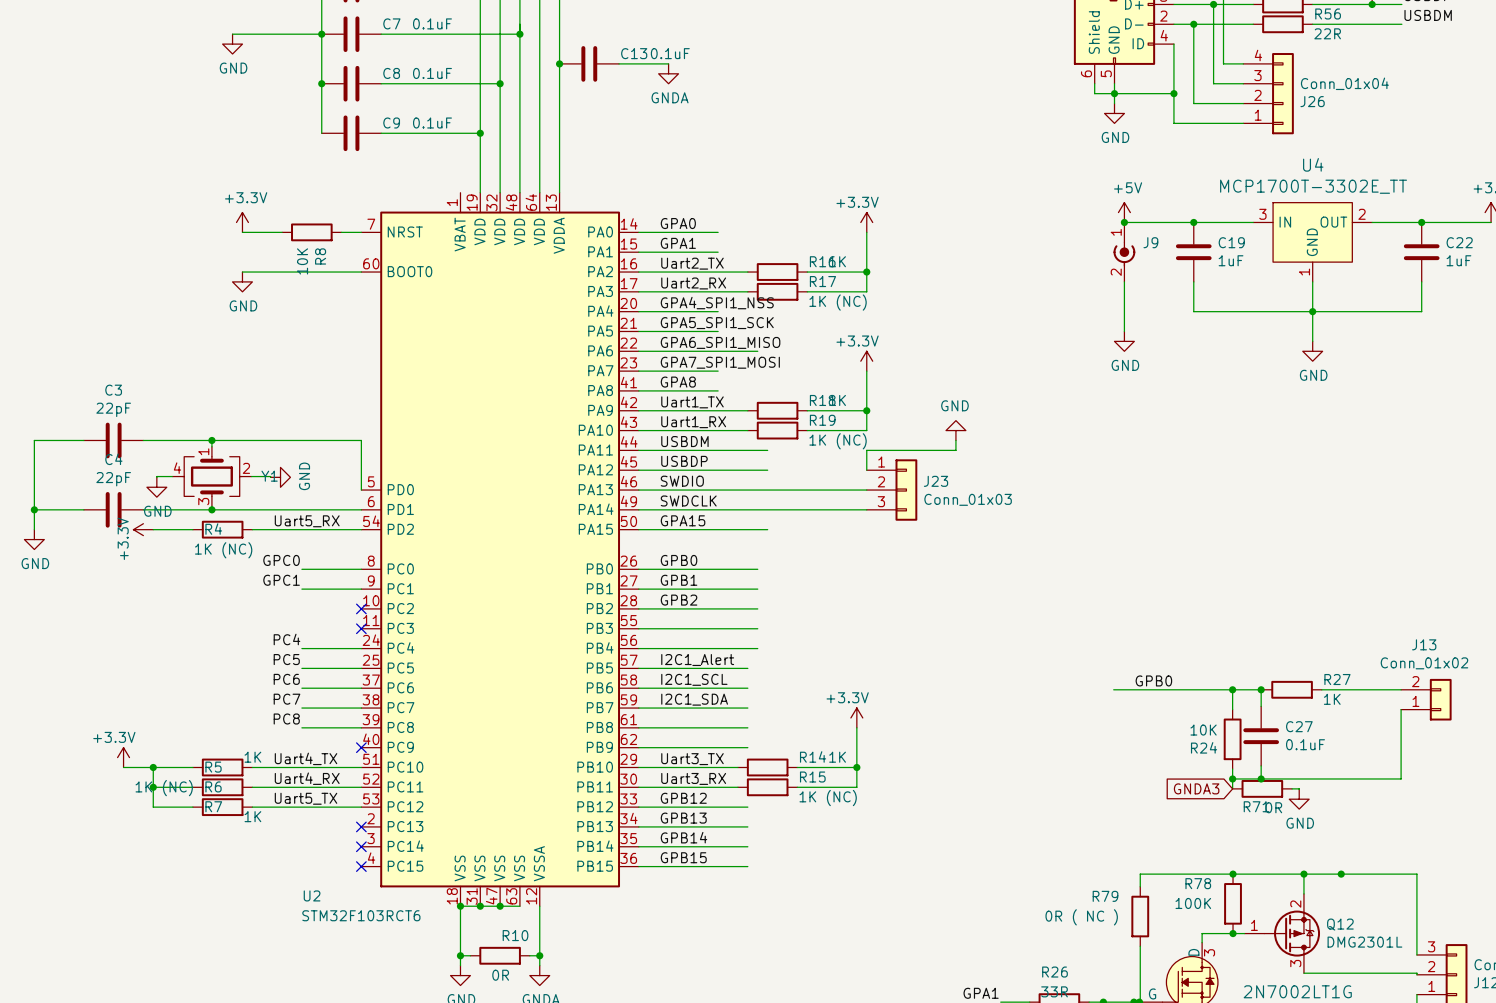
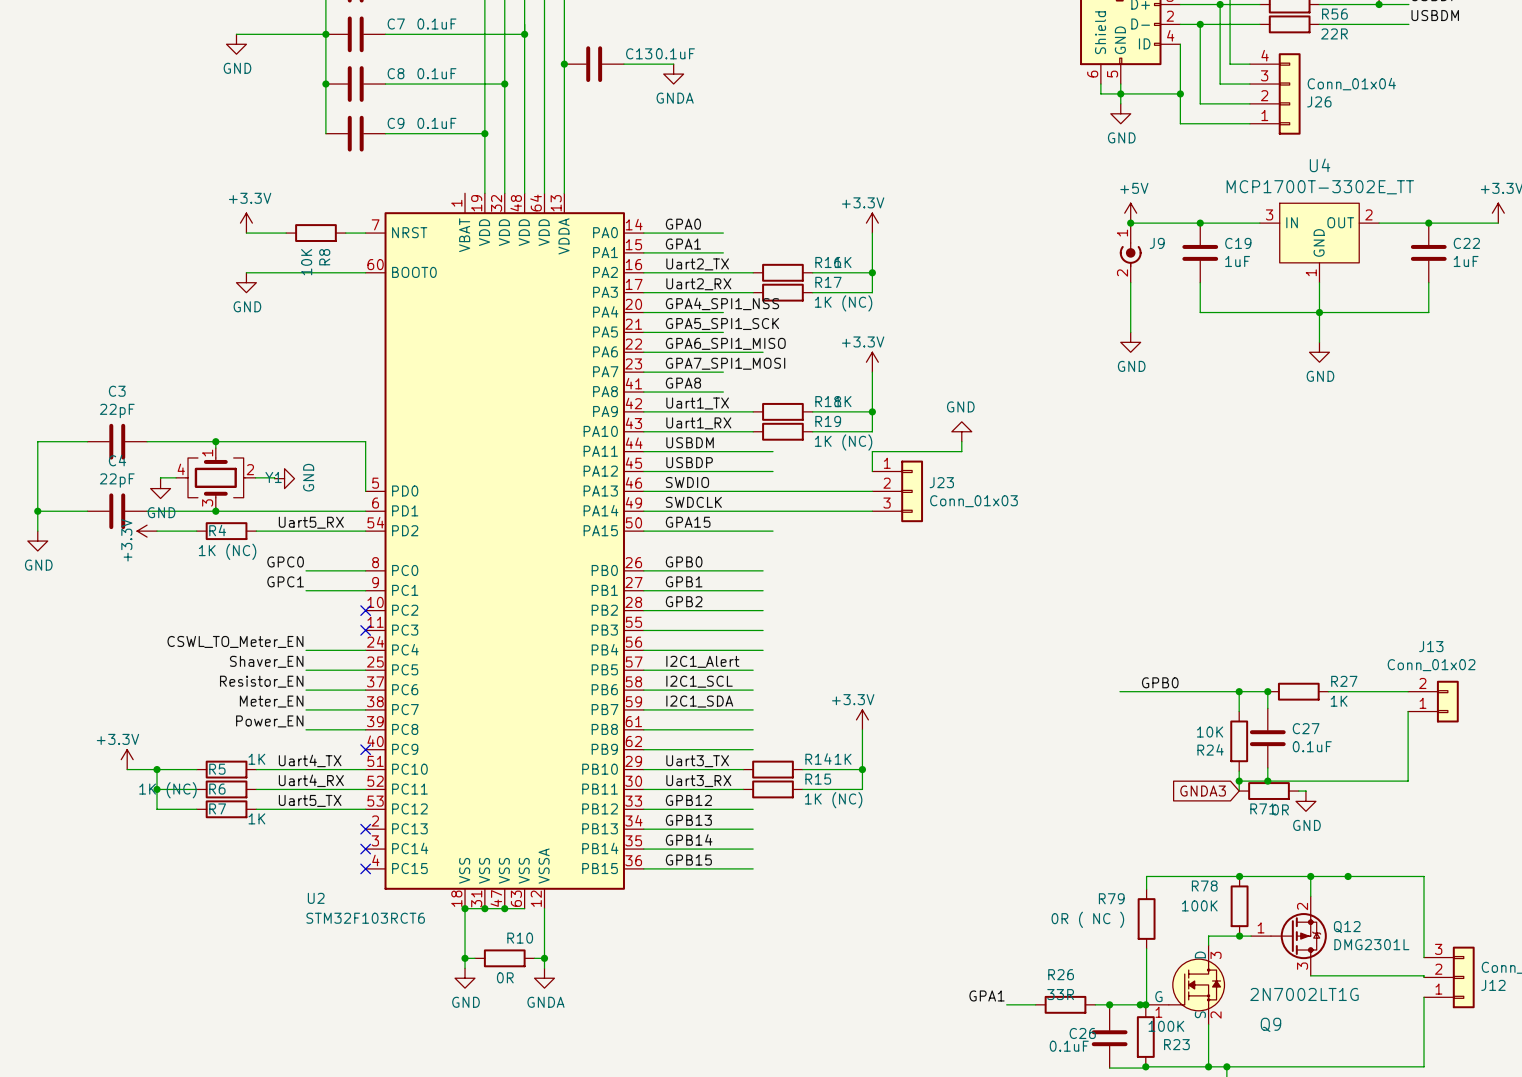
label: PC4 (286, 639) -> CSWL_TO_Meter_EN (235, 641)
label: PC5 (286, 659) -> Shaver_EN (266, 661)
label: PC6 (286, 679) -> Resistor_EN (261, 681)
label: PC7 (286, 699) -> Meter_EN (271, 701)
label: PC8 (286, 719) -> Power_EN (269, 721)

